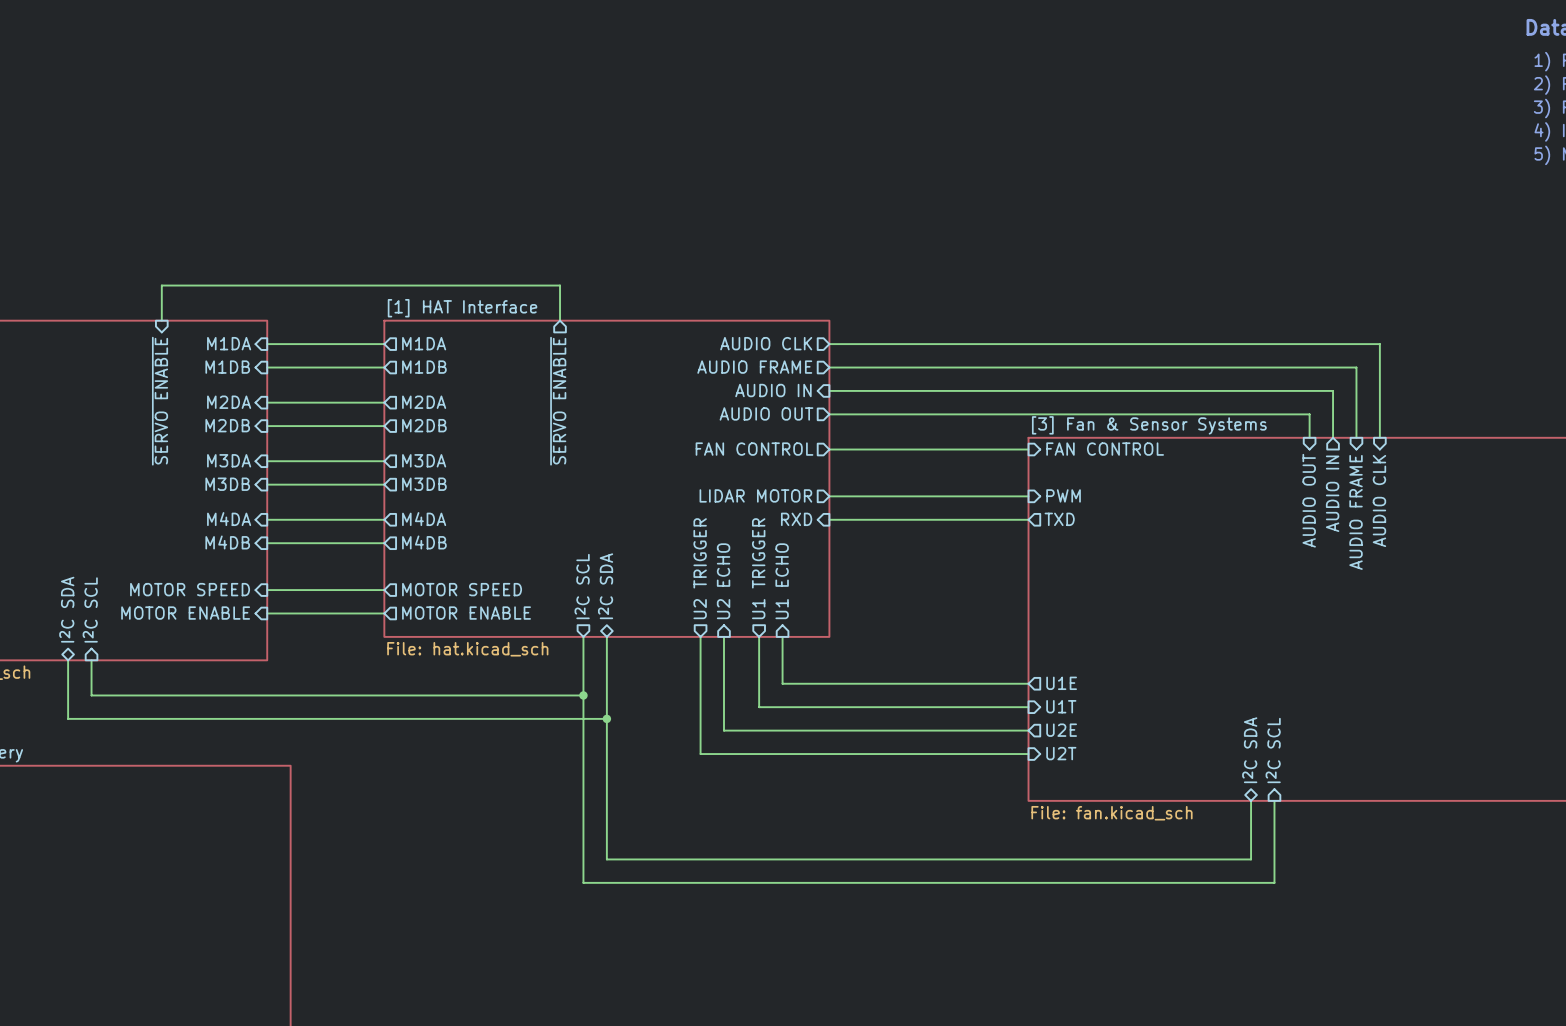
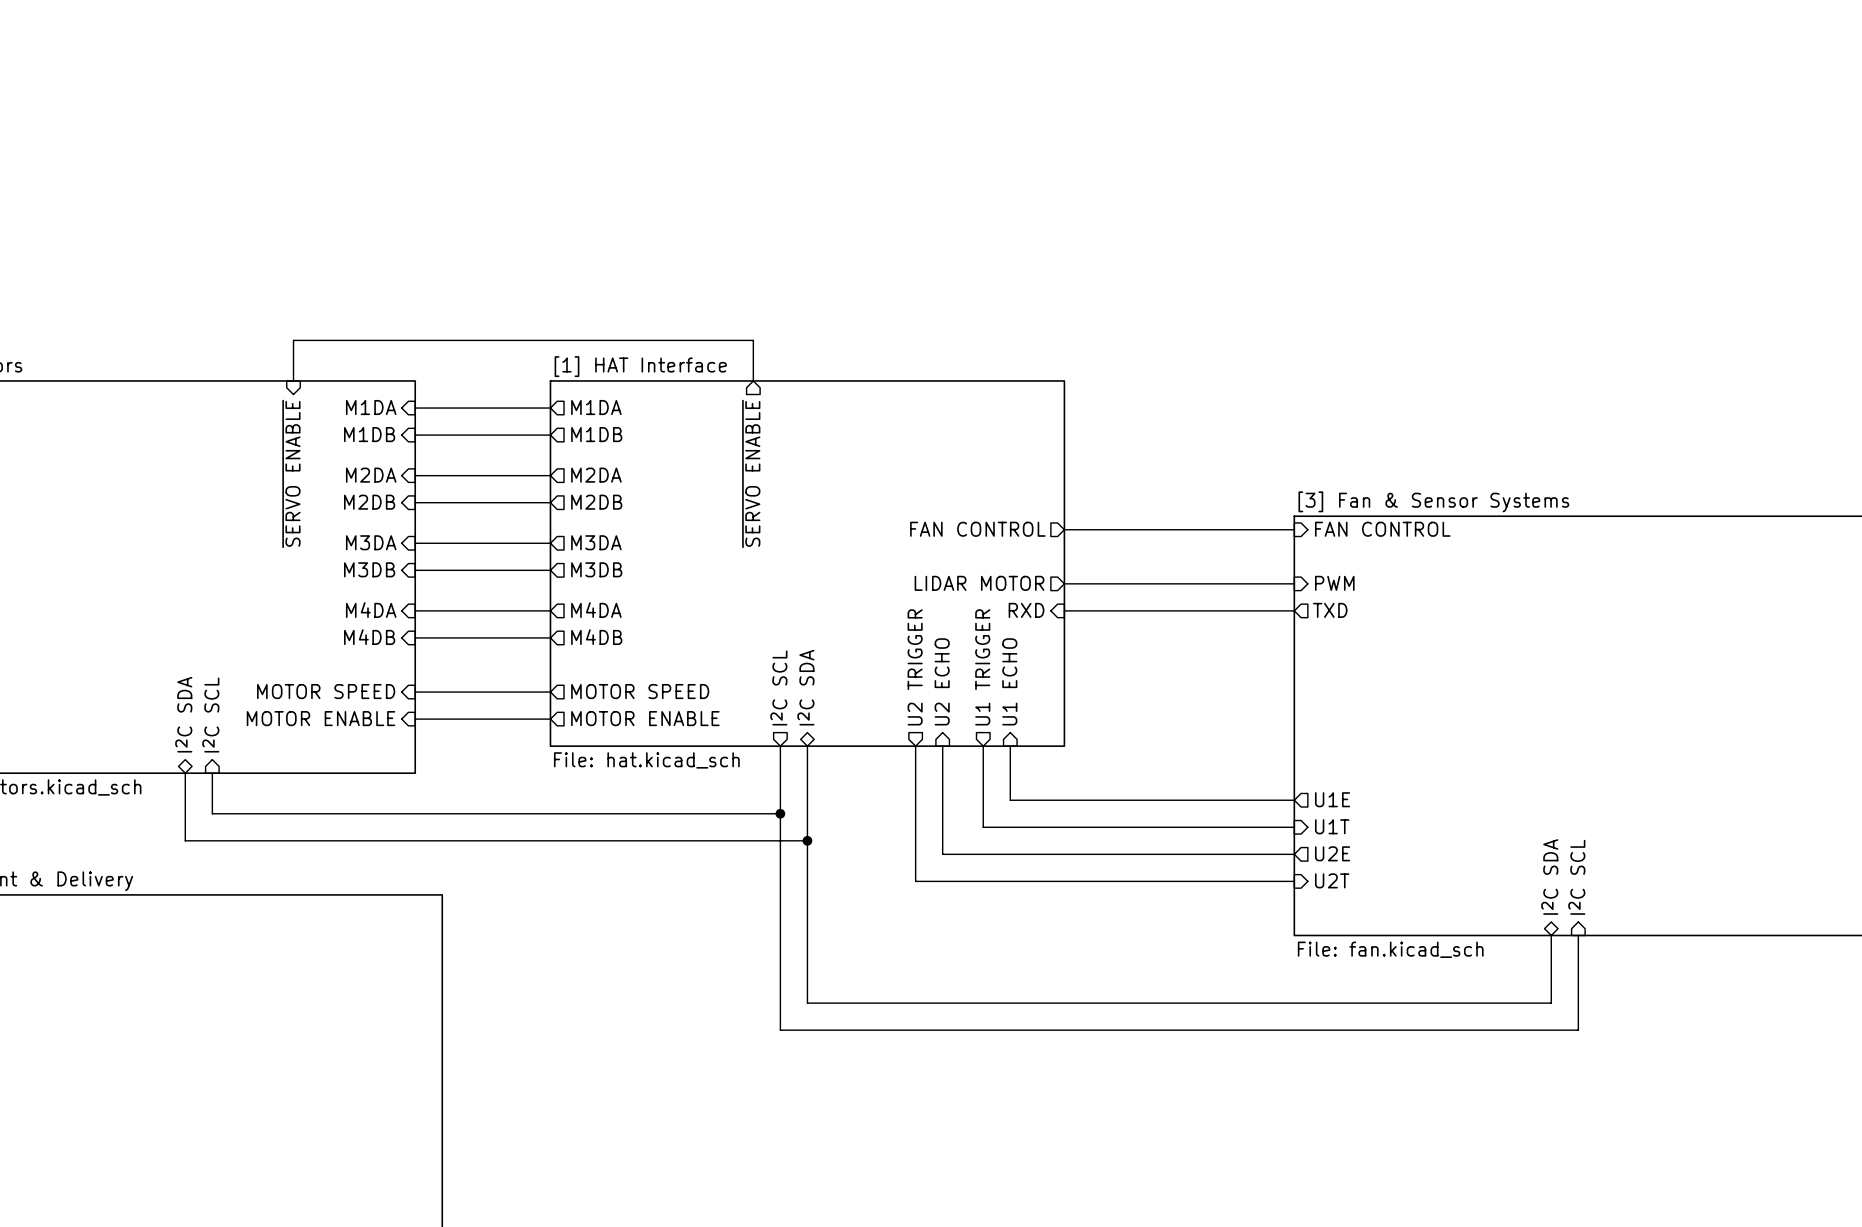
sheet pin: AUDIO CLK (766, 343) -> none
wire: (829, 344) (1379, 344) (1379, 437) -> none
sheet pin: AUDIO FRAME (754, 367) -> none
wire: (829, 367) (1356, 367) (1356, 437) -> none
sheet pin: AUDIO IN (773, 390) -> none
wire: (829, 390) (1333, 390) (1333, 437) -> none
sheet pin: AUDIO OUT (766, 413) -> none
wire: (829, 414) (1309, 414) (1309, 437) -> none
sheet pin: AUDIO IN (1332, 493) -> none
sheet pin: AUDIO OUT (1309, 500) -> none
sheet pin: AUDIO CLK (1379, 501) -> none
sheet pin: AUDIO FRAME (1356, 512) -> none

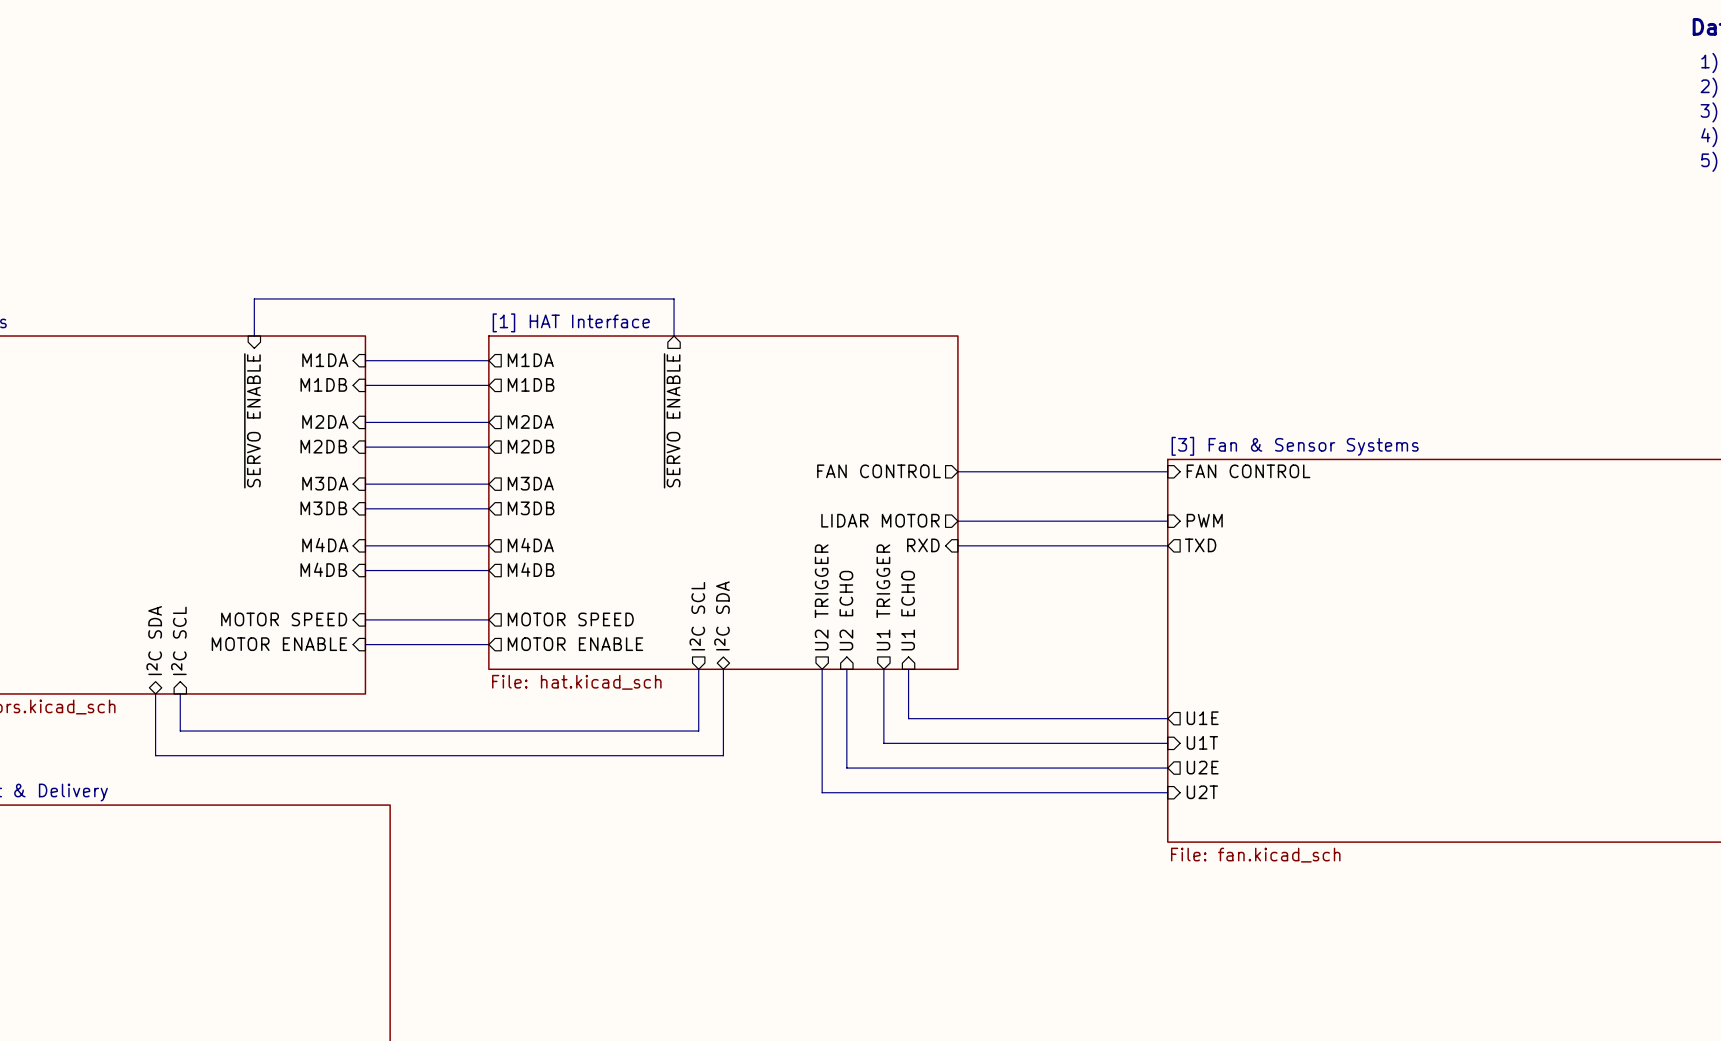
wire: (780, 813) (780, 1030) (1578, 1030) (1578, 935) -> none
junction: (780, 813) -> none
wire: (807, 840) (807, 1003) (1551, 1003) (1551, 935) -> none
junction: (807, 840) -> none
sheet pin: I2C SDA (1549, 876) -> none
sheet pin: I2C SCL (1576, 877) -> none

